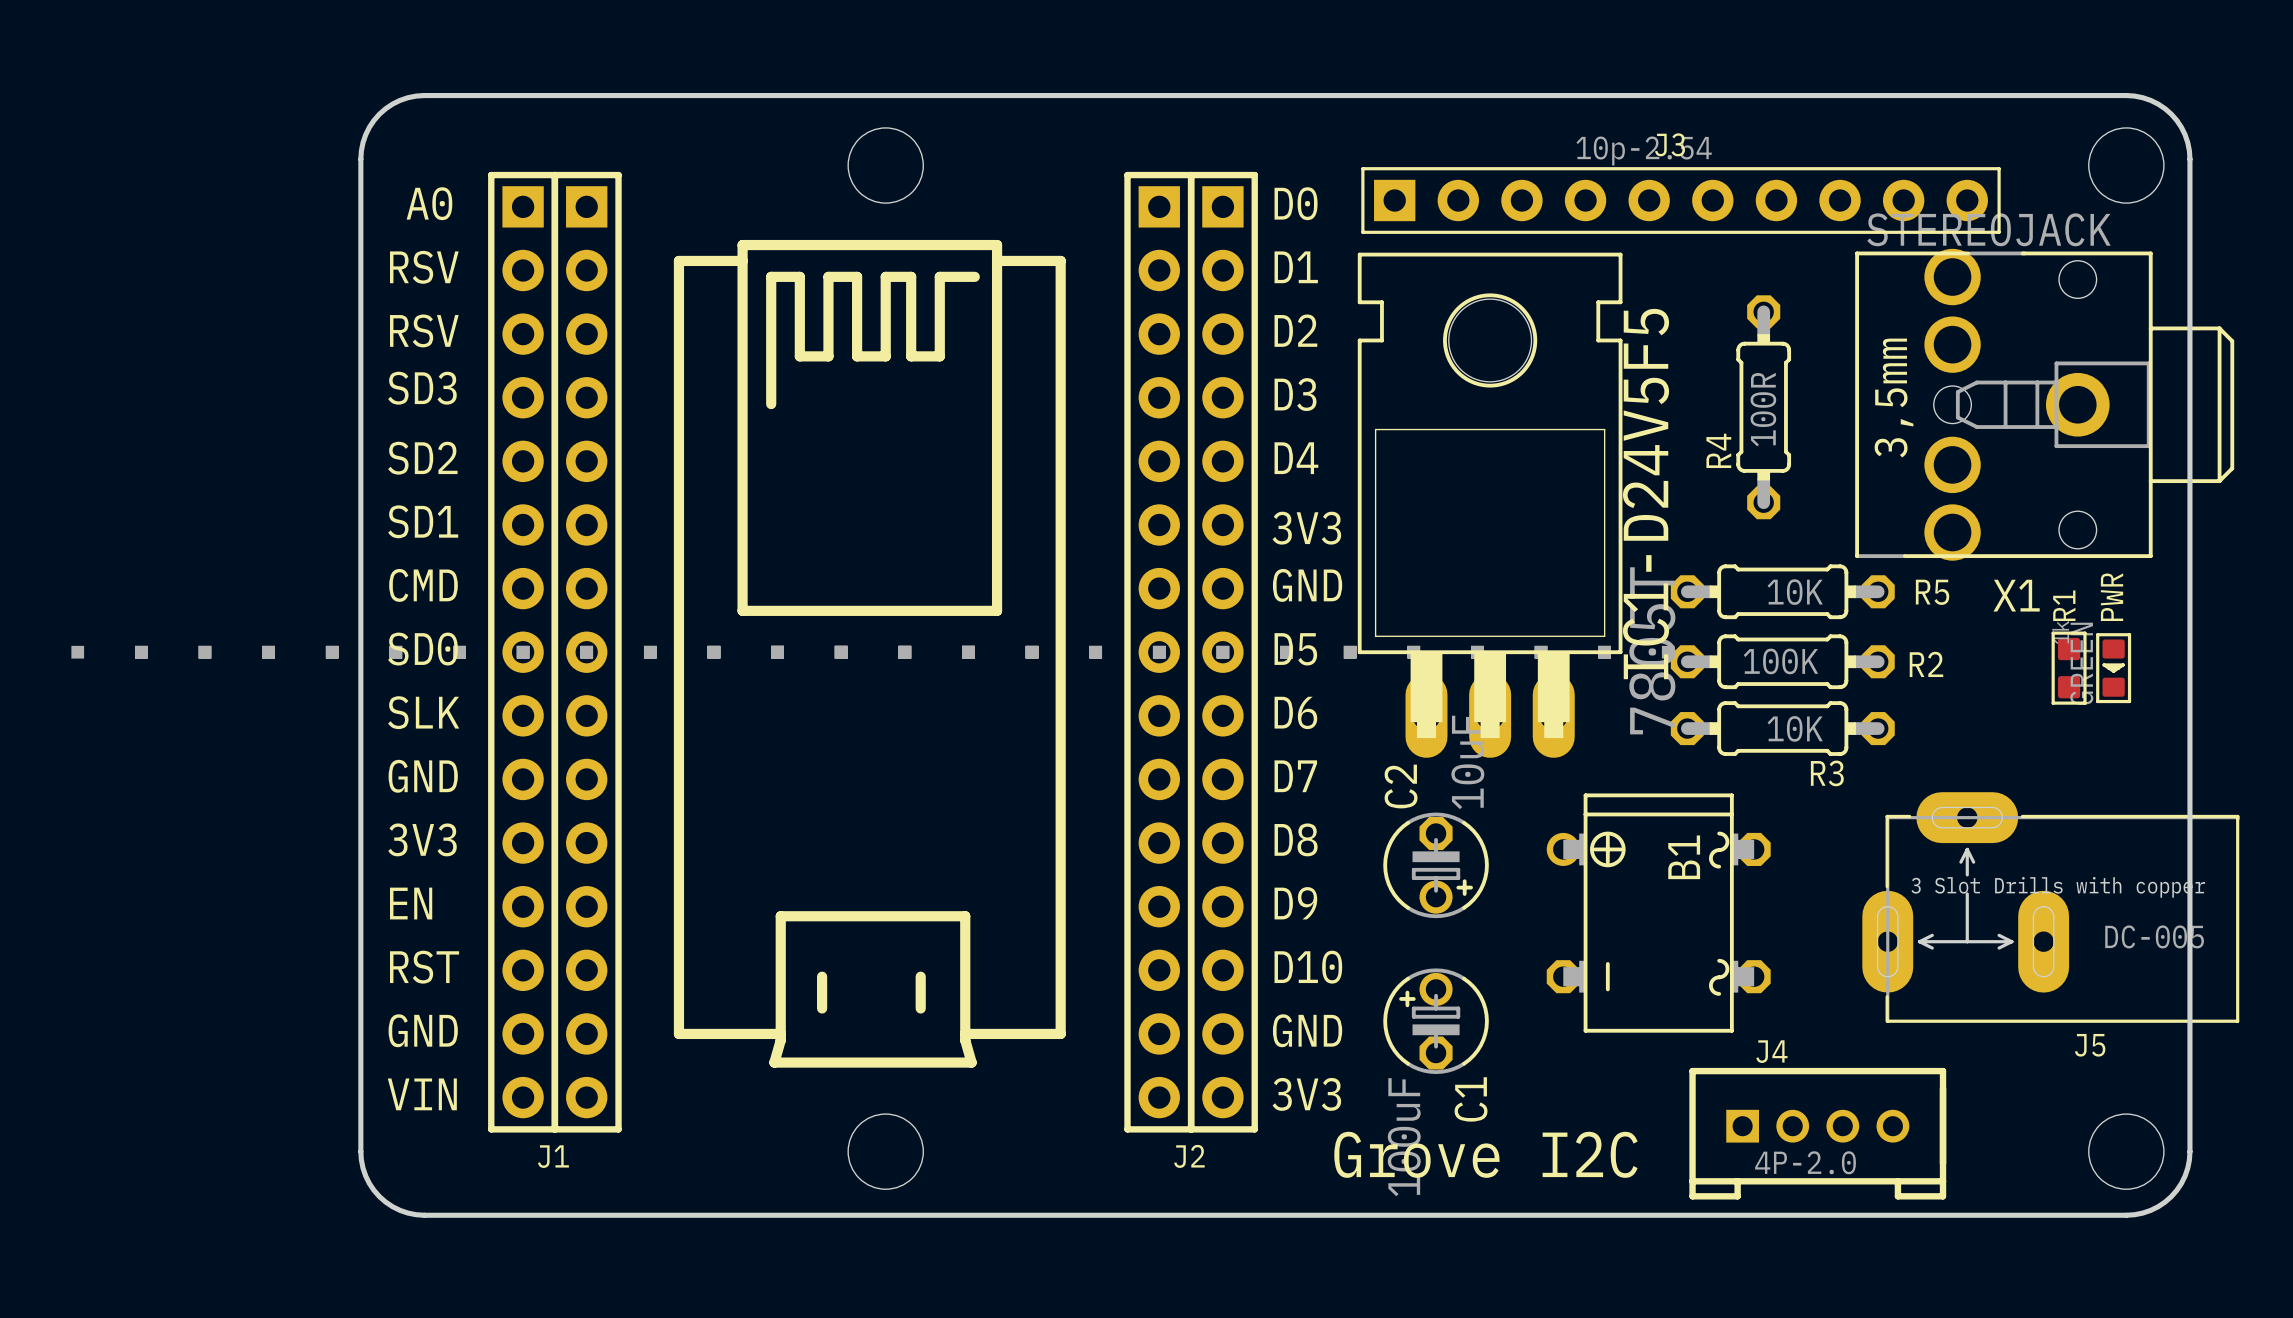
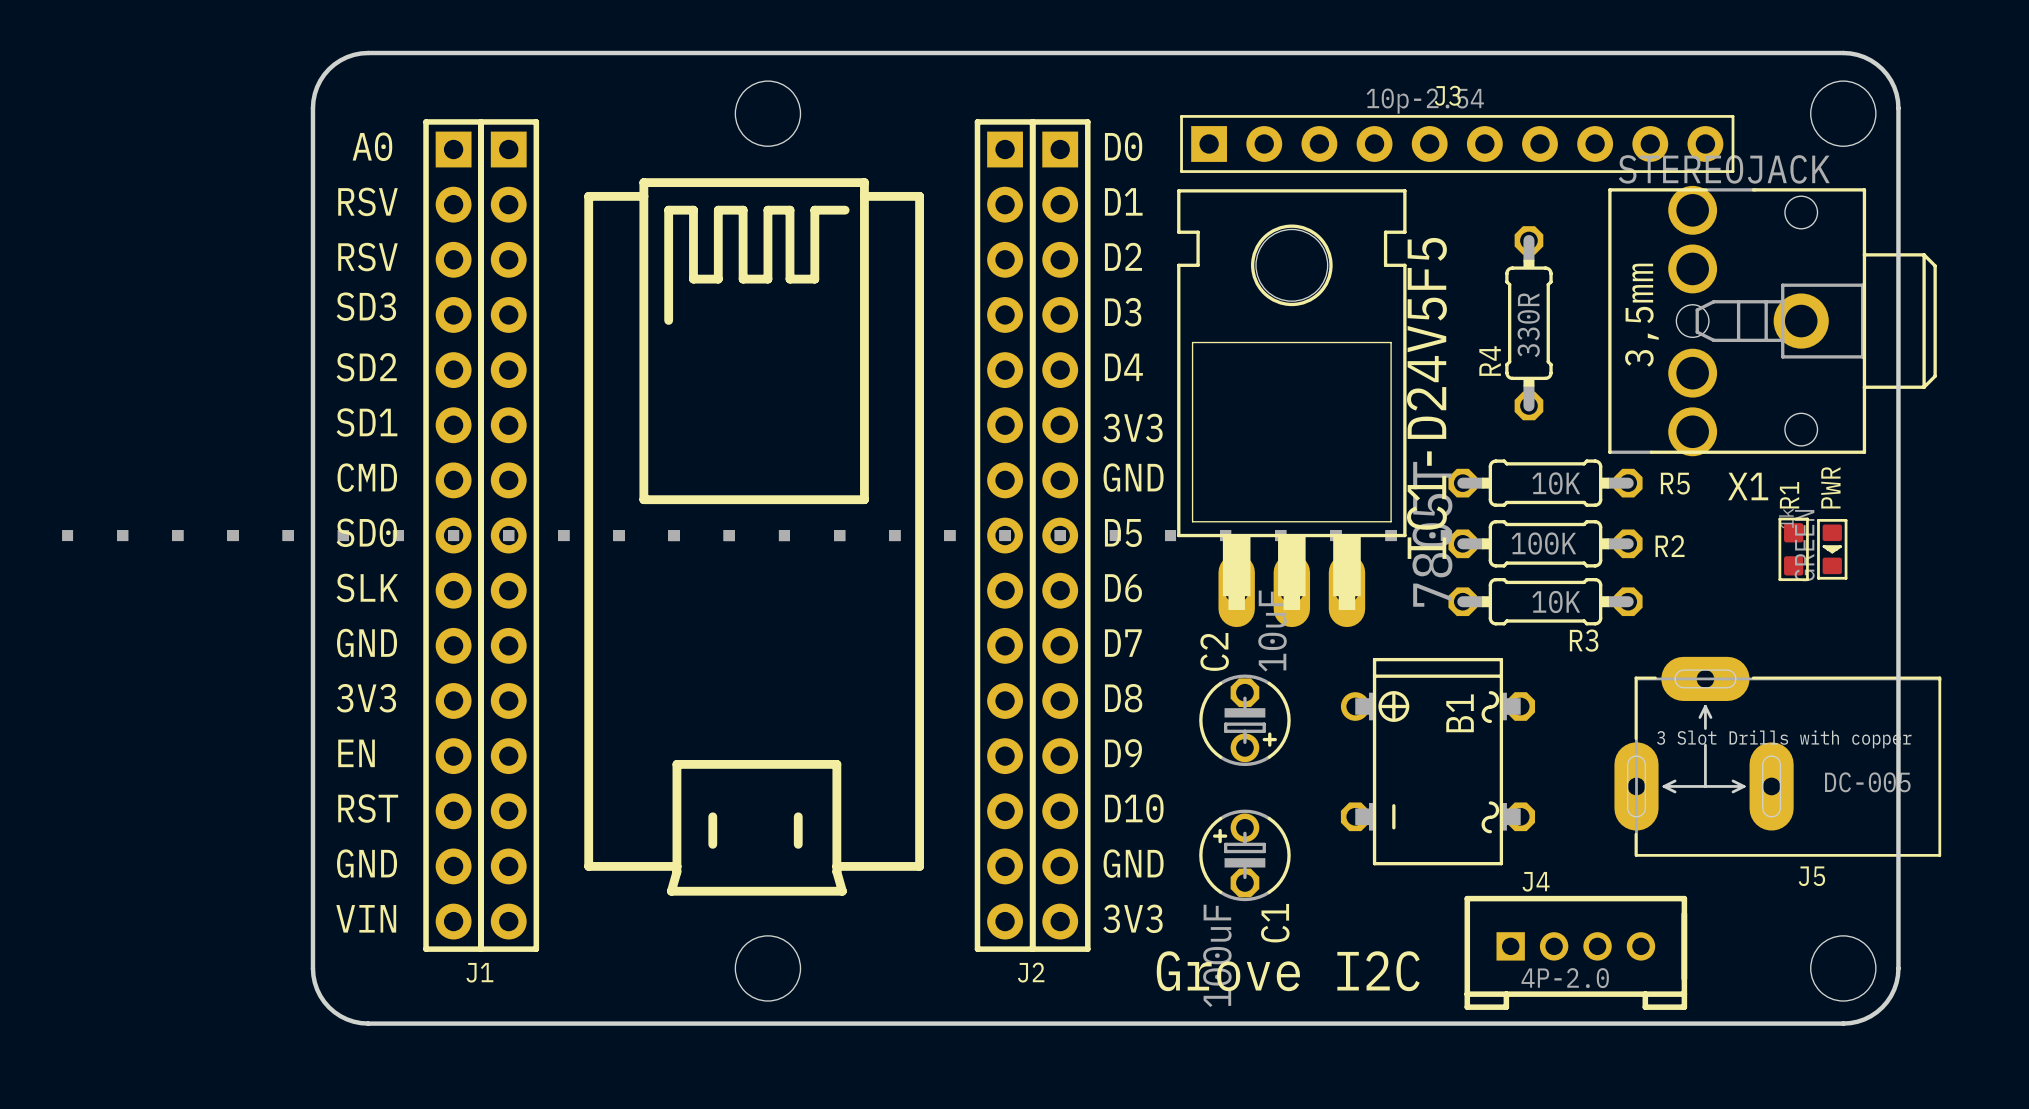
R4 value: 100R (1763, 409) -> 330R (1528, 325)

